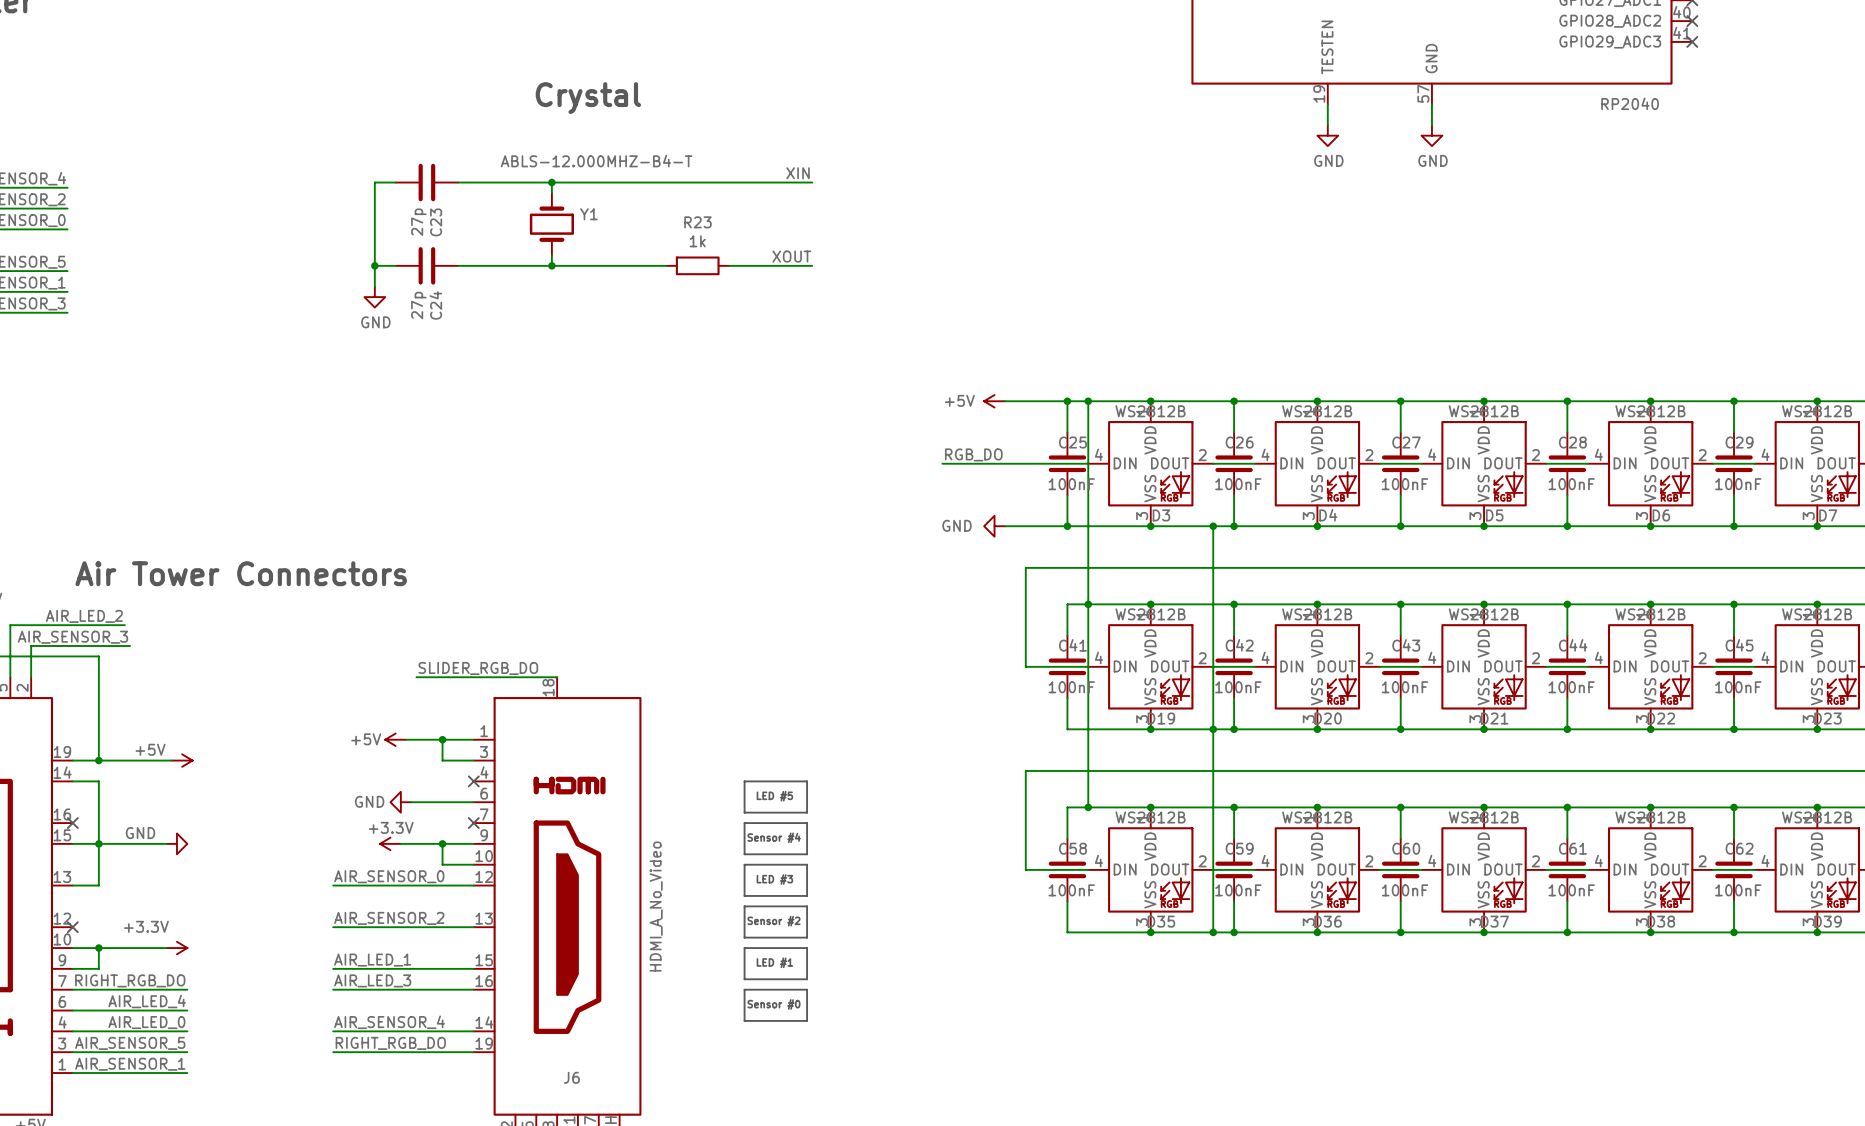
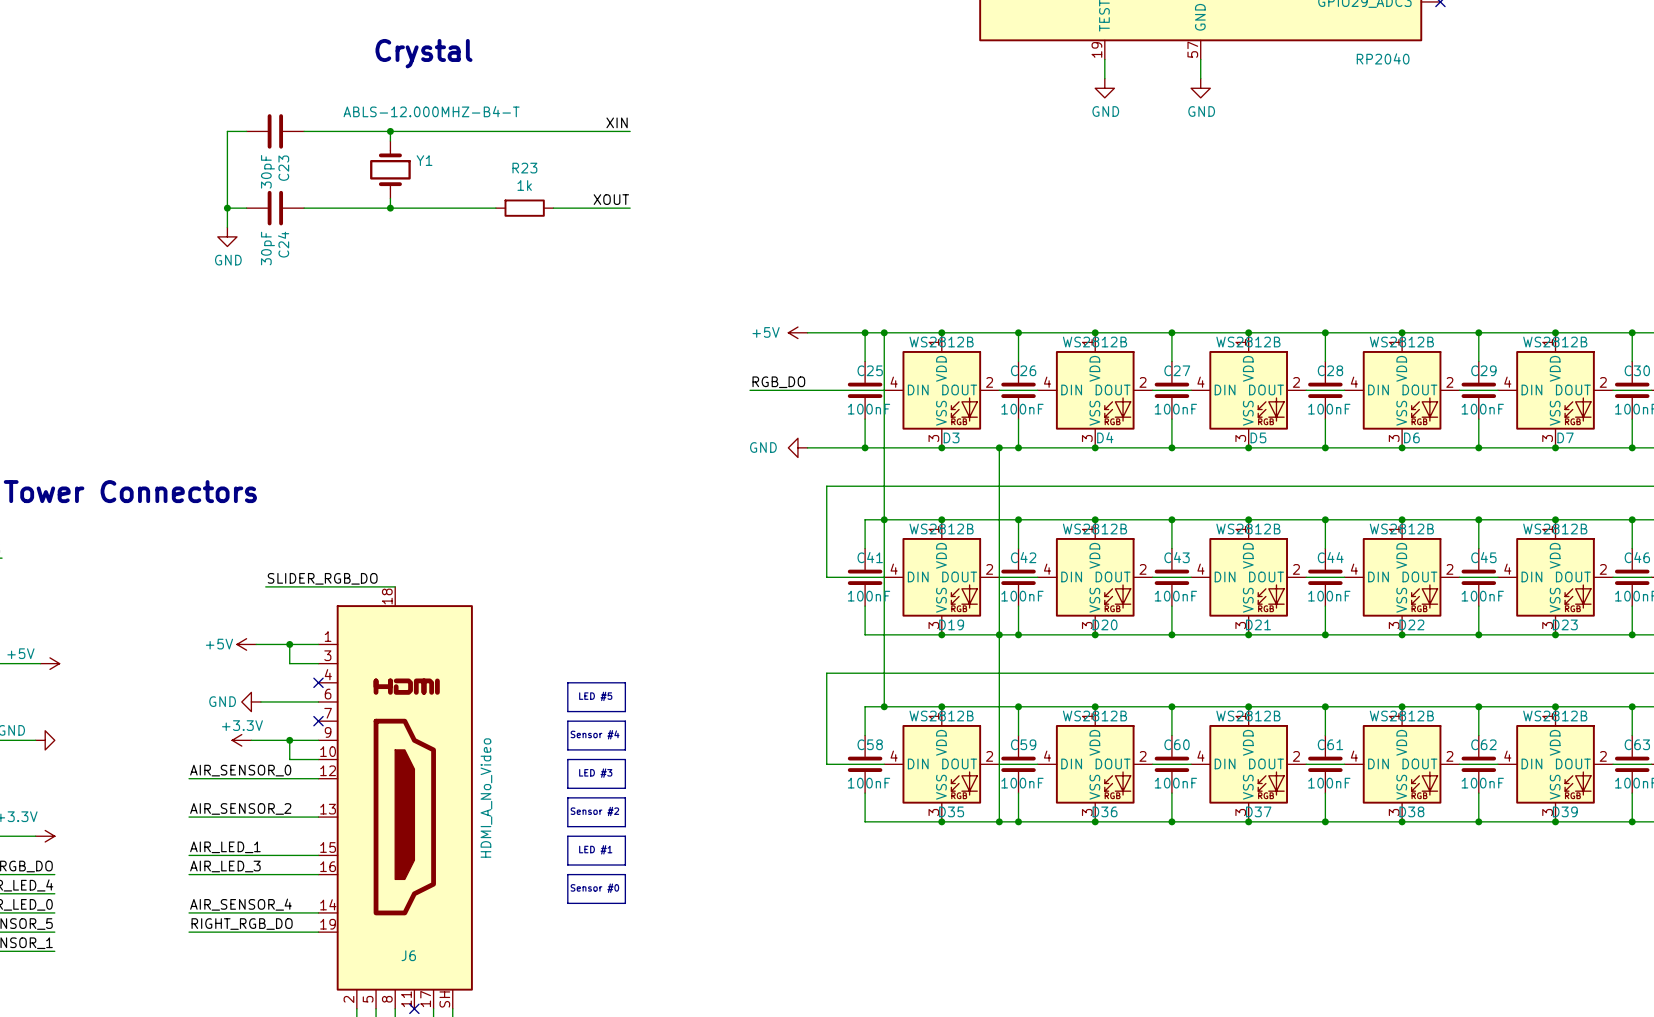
C23 value: 27p (418, 222) -> 30pF (267, 171)
C24 value: 27p (418, 305) -> 30pF (267, 248)

